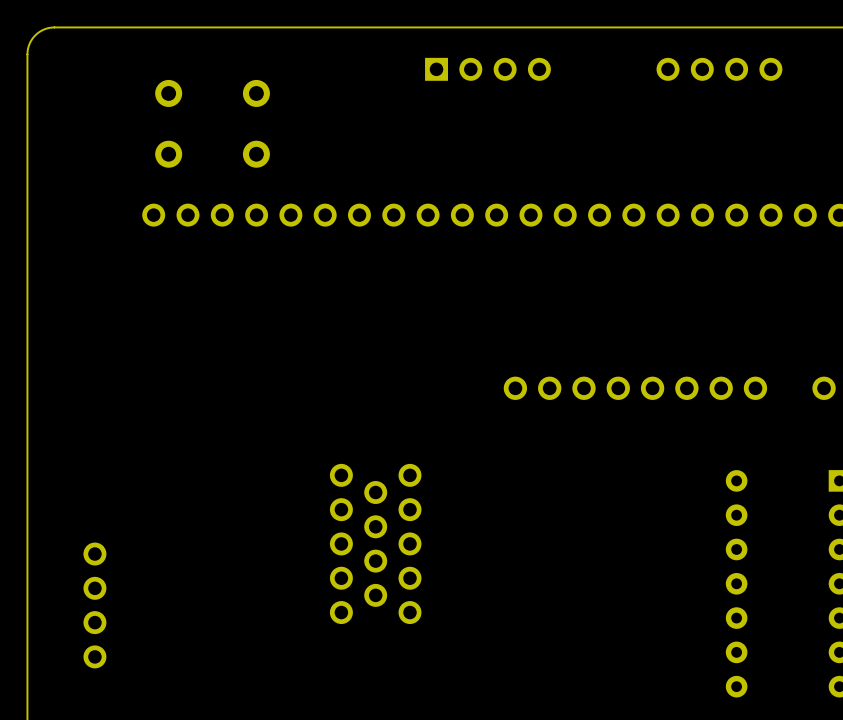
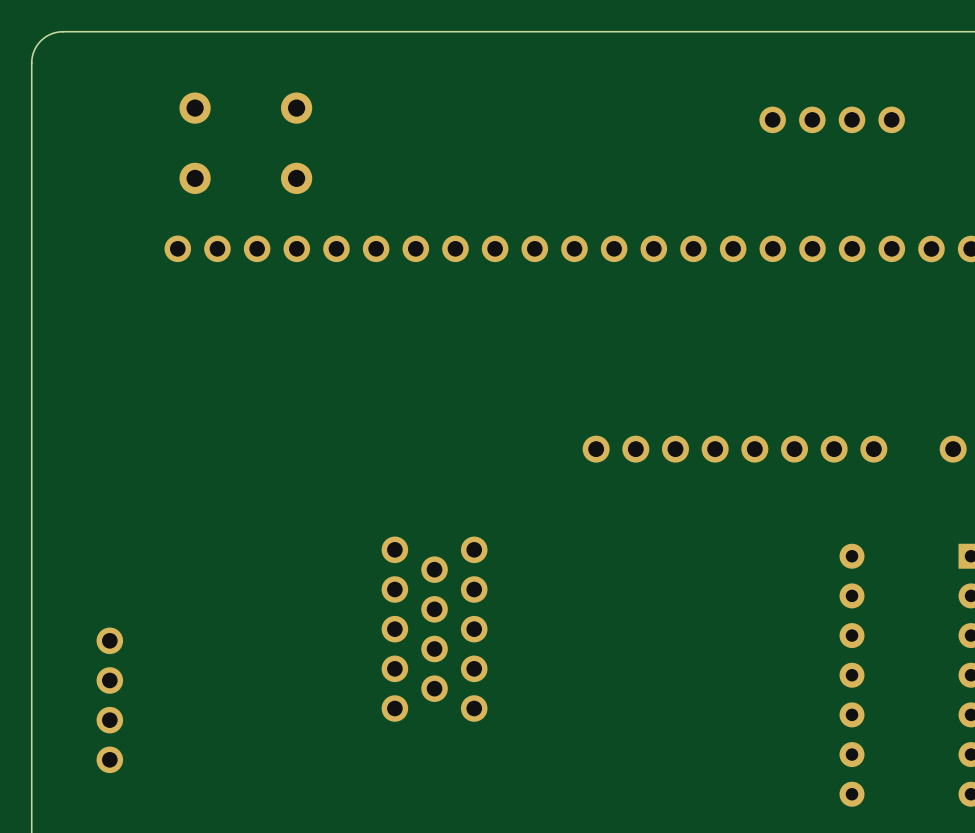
part: (487, 69) -> none
part position: (719, 69) -> (832, 119)

